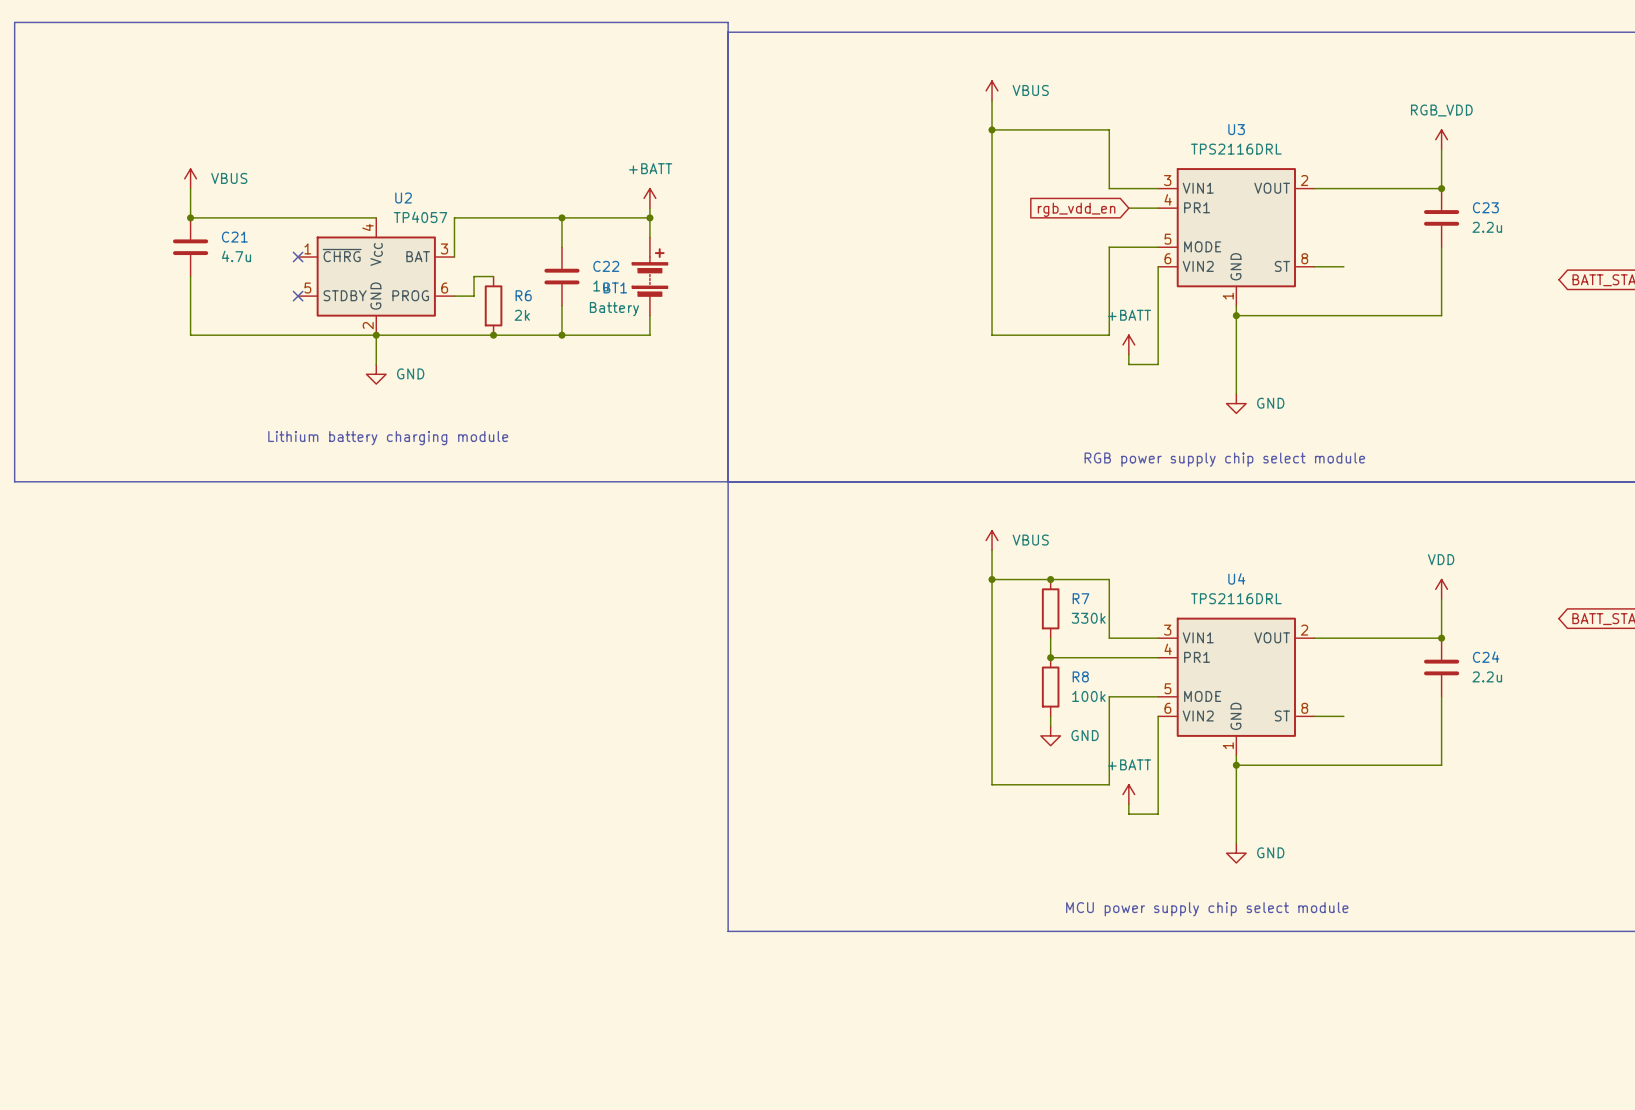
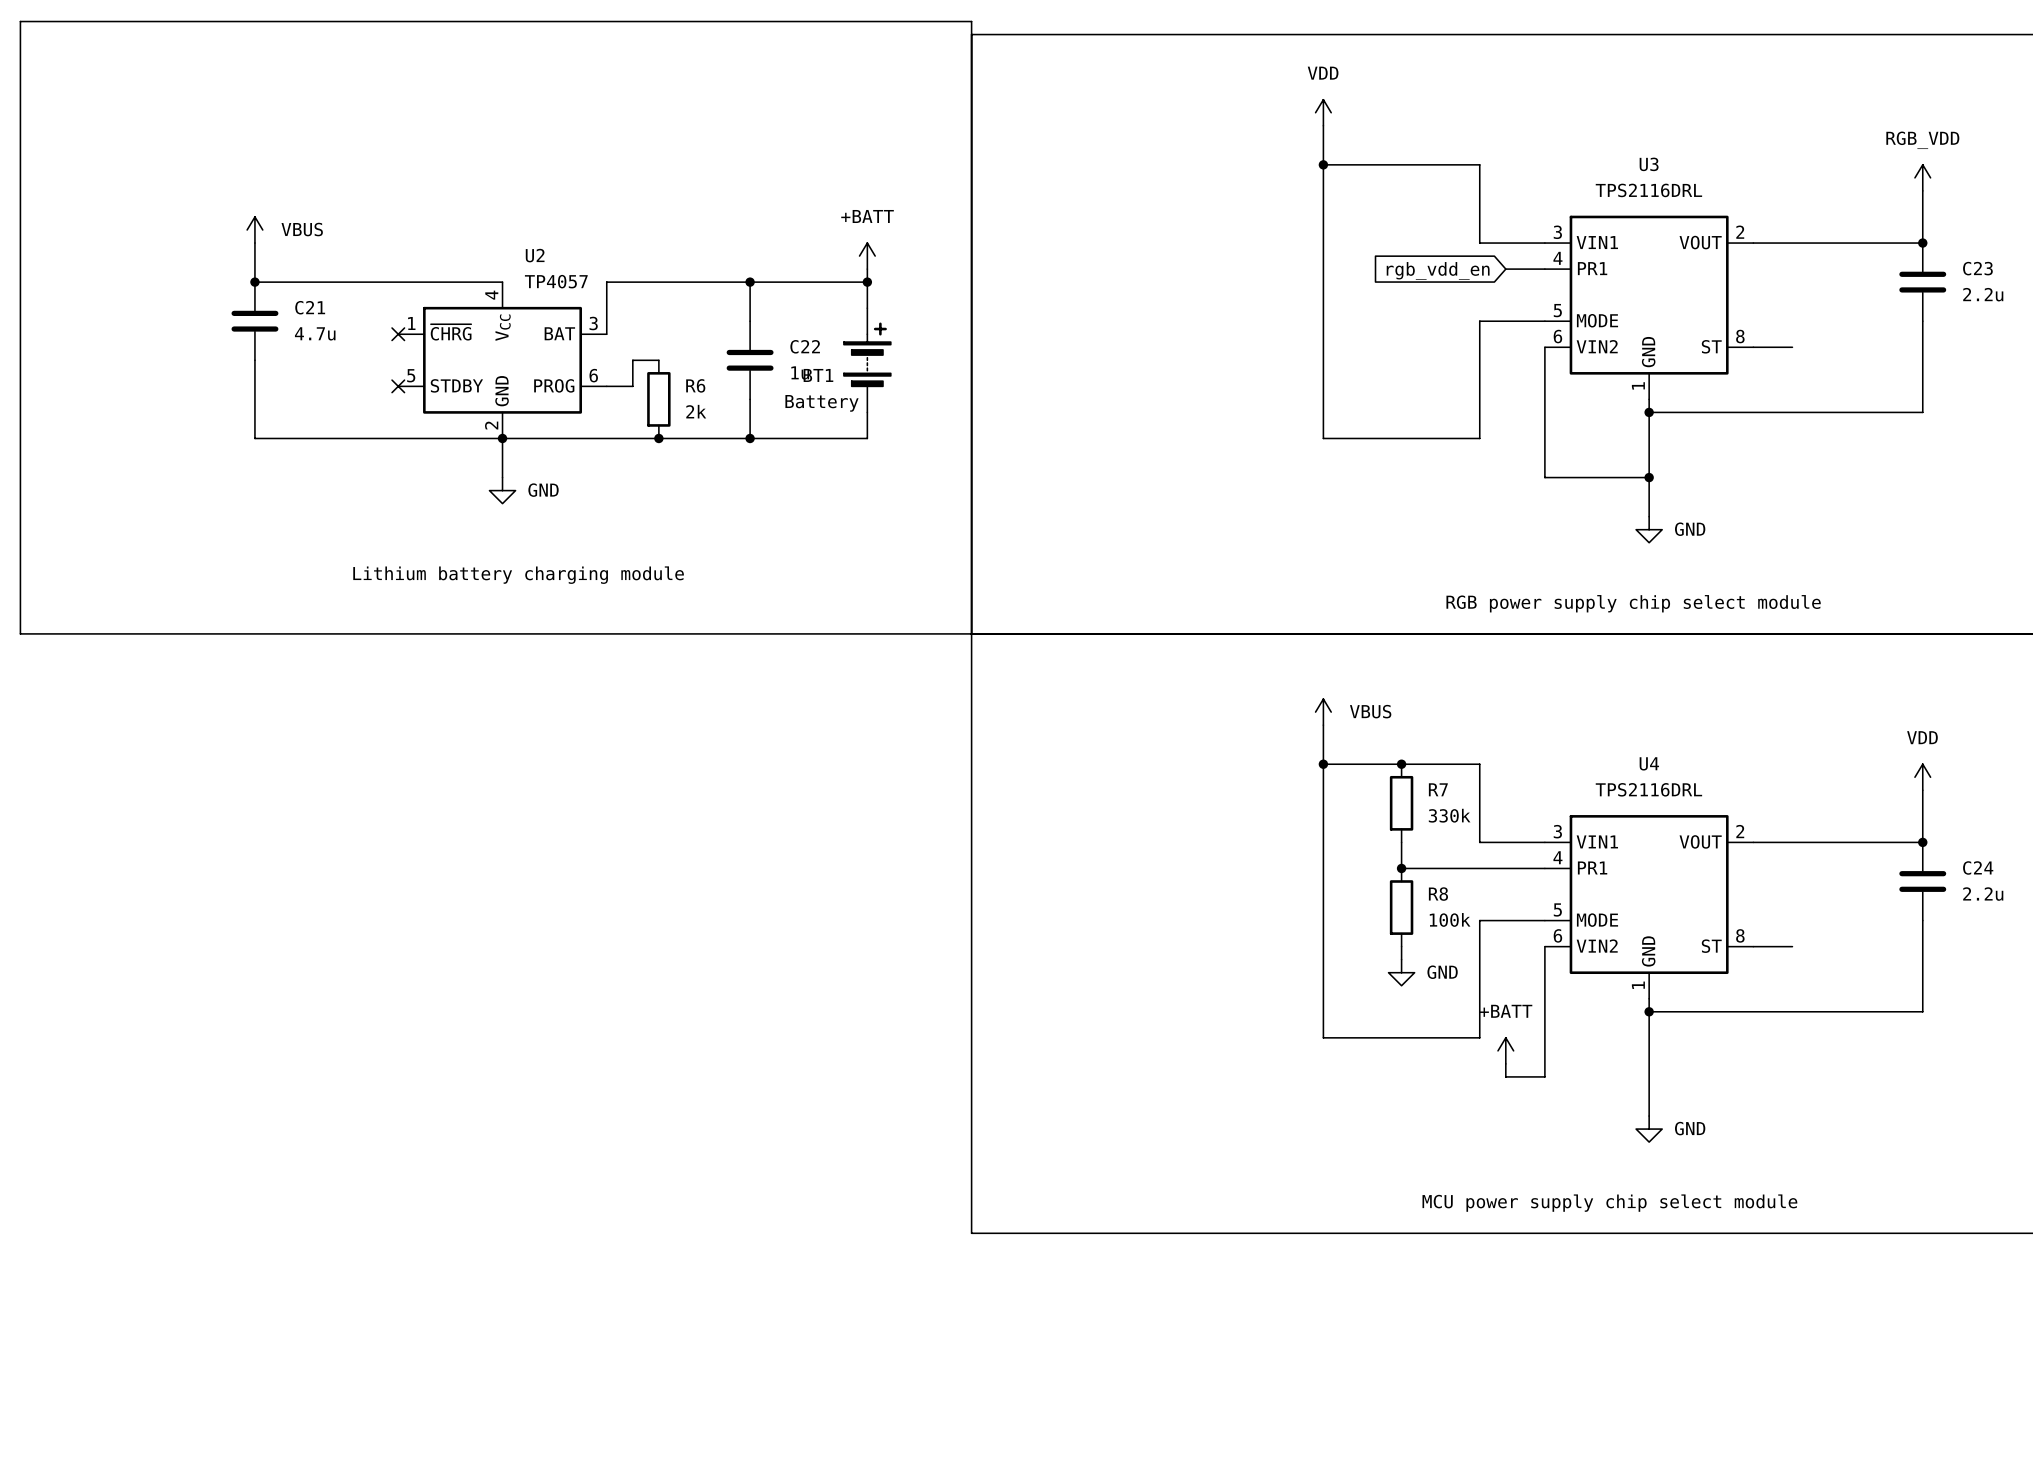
power symbol: VBUS (992, 90) -> VDD (1323, 112)
power symbol: +BATT (1128, 344) -> none
wire: (1128, 354) (1128, 364) (1158, 364) -> (1649, 477) (1544, 477)
junction: none -> (1649, 477)

